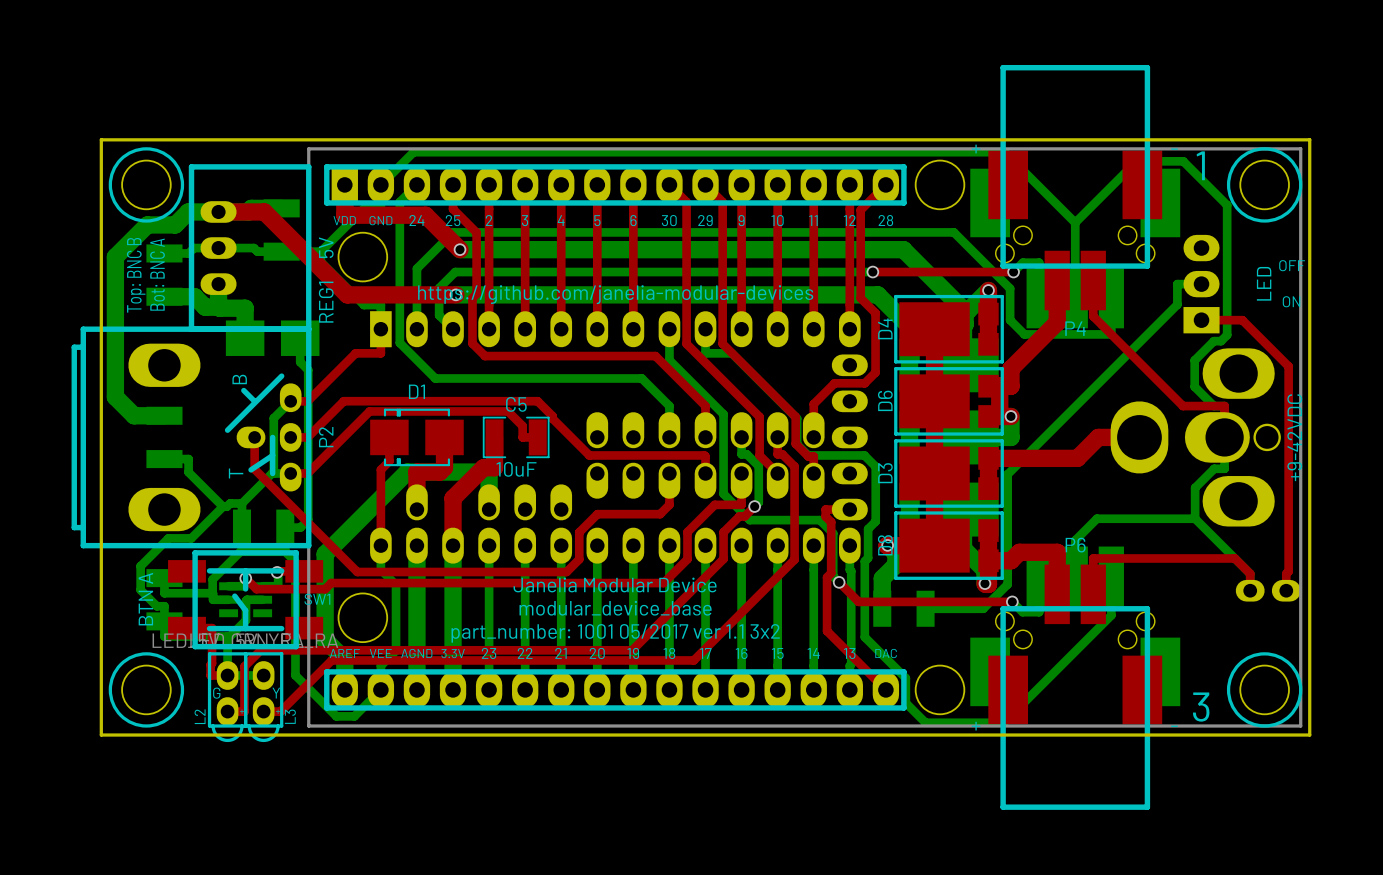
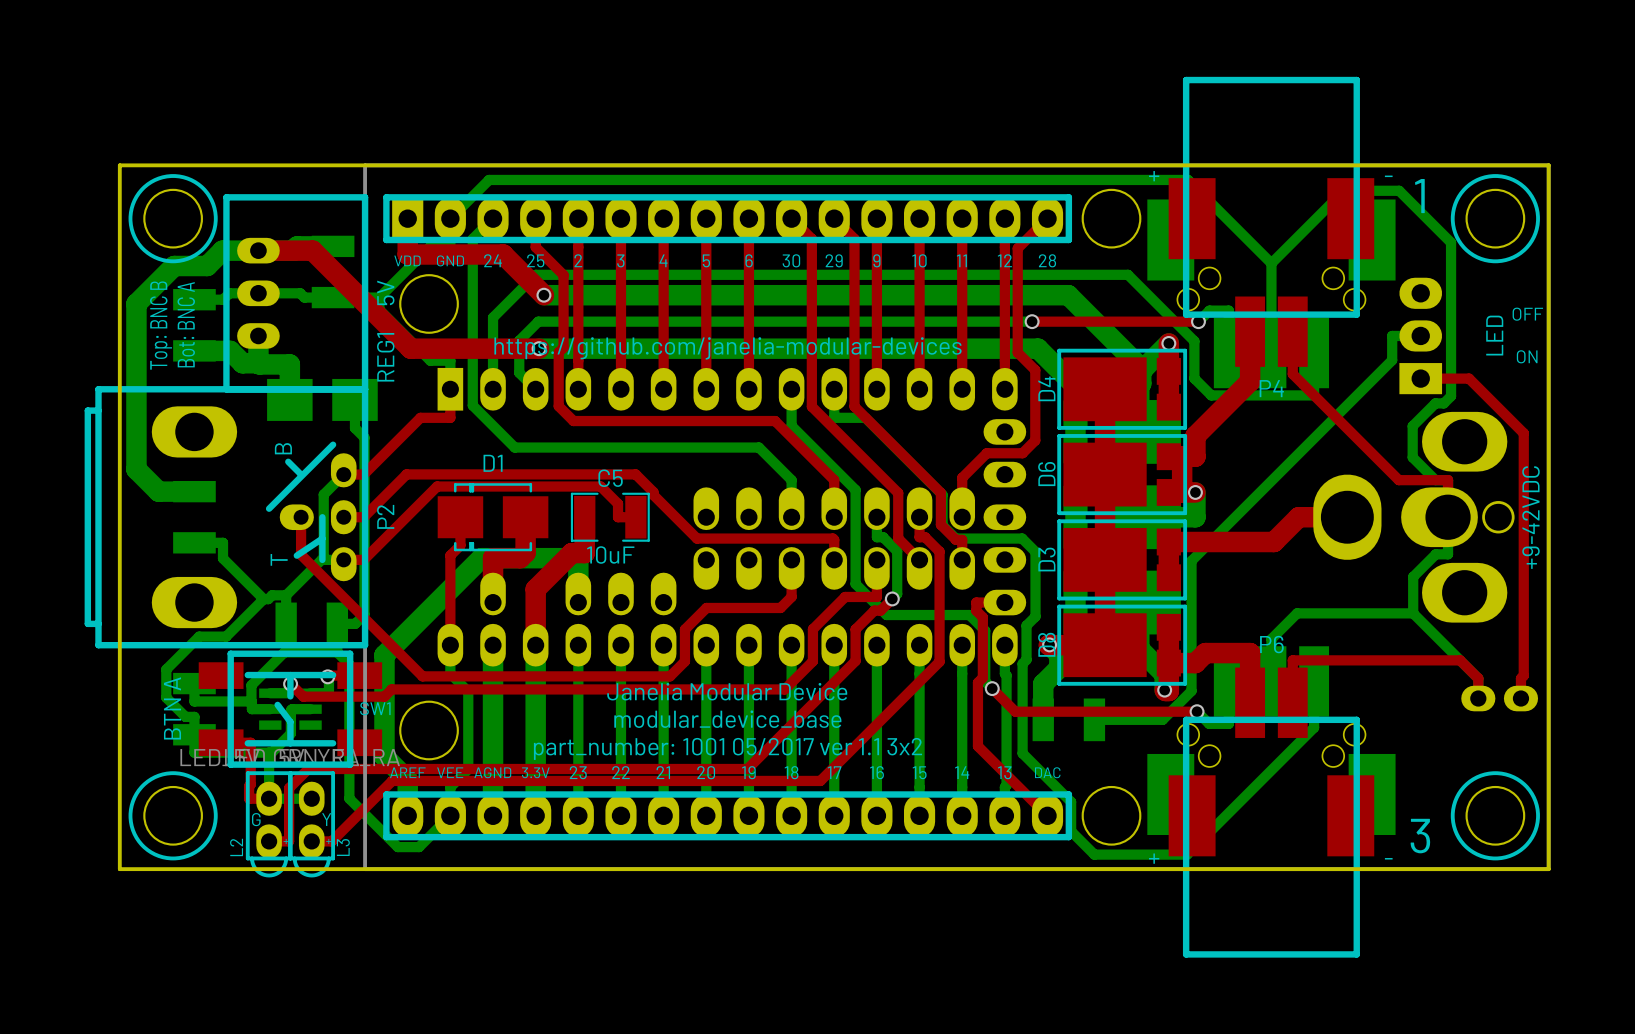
part footprint: [307, 147, 1303, 728] -> [363, 163, 1551, 872]

